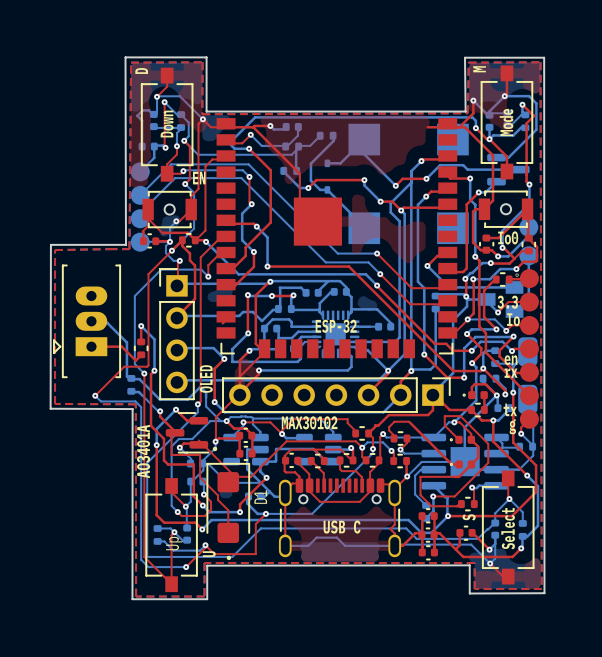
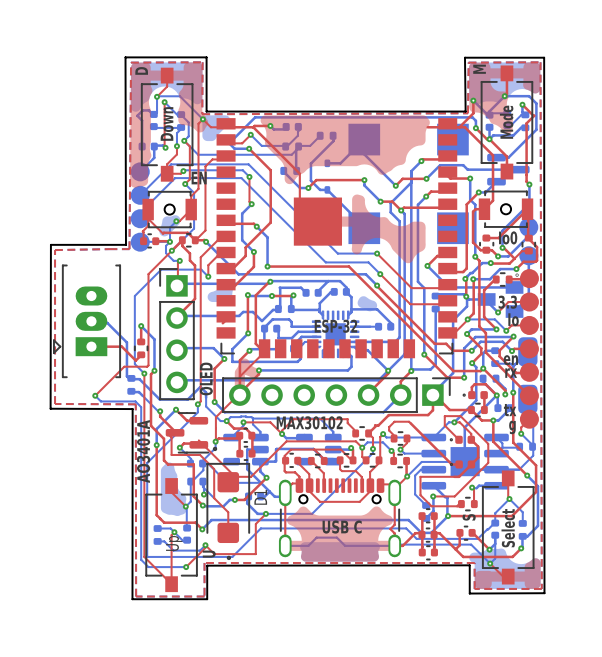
bottom track: (220, 421) (210, 421) (192, 439) (178, 439) (171, 446) (171, 505) (177, 512) -> none
top track: (200, 454) (200, 477) (218, 495) (218, 500) (228, 512) -> (200, 454) (214, 469) (214, 498) (228, 512)
bottom track: none -> (202, 482) (202, 486) (214, 498)
top track: (203, 494) (211, 501) (211, 509) (204, 515) (181, 515) (177, 512) -> none
top track: (244, 499) (240, 504) (240, 512) -> (244, 499) (234, 499)
bottom track: (203, 506) (209, 512) (240, 512) -> (203, 506) (223, 506) (229, 499) (234, 499)
via: (177, 512) -> none
via position: (240, 512) -> (234, 499)

